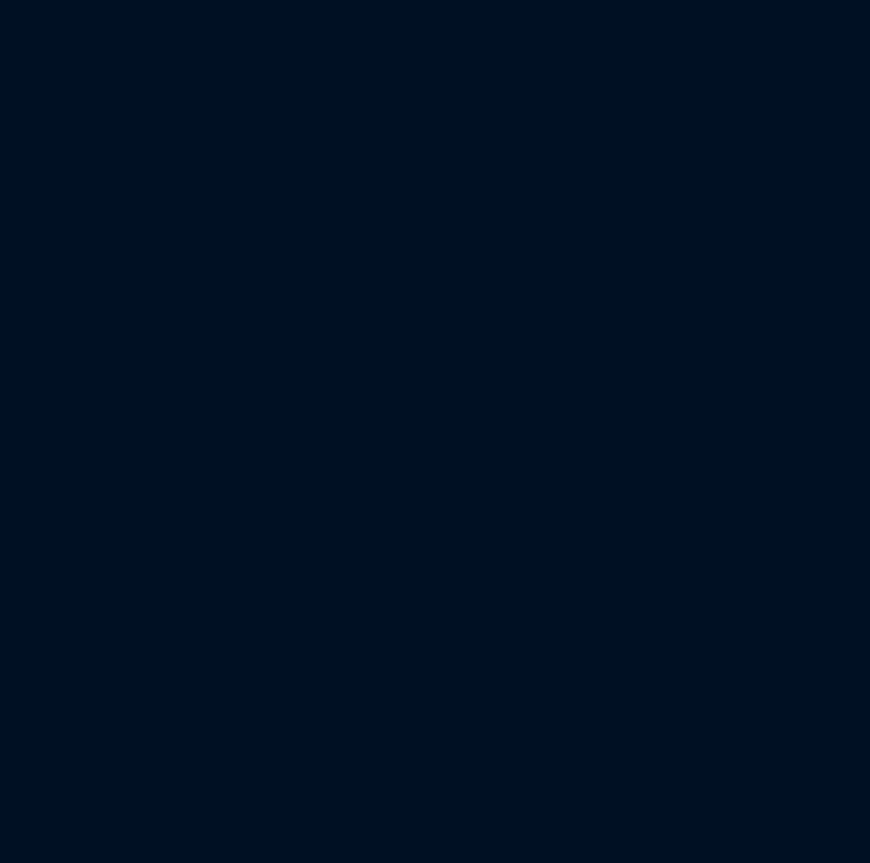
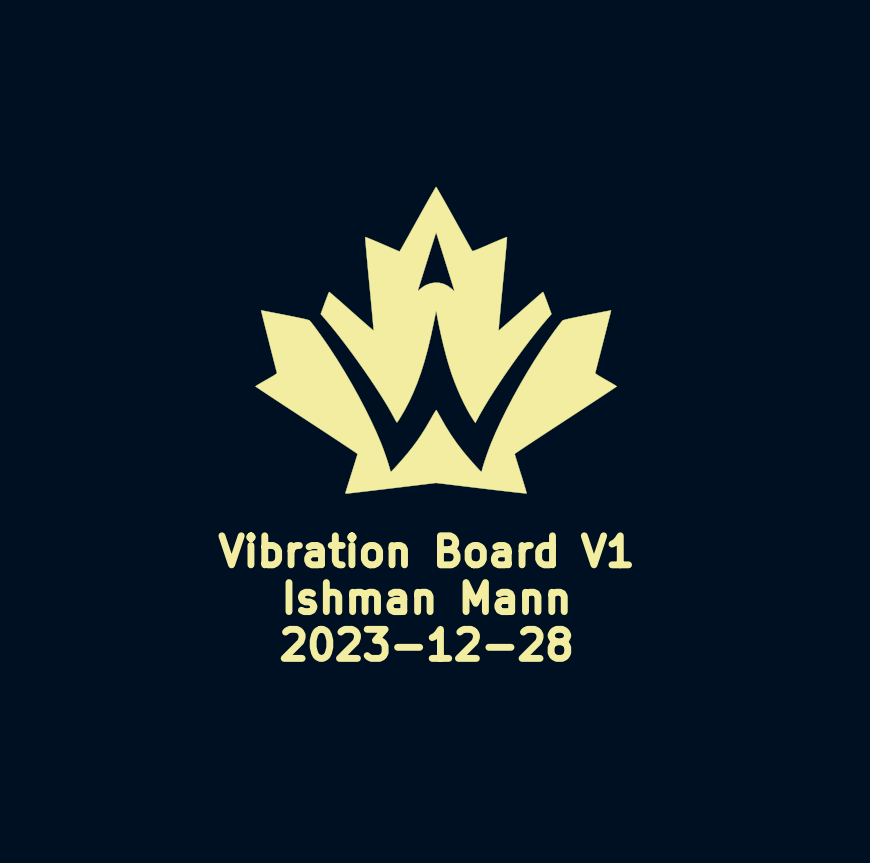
drawing: none -> [255, 186, 617, 494]
text: none -> Vibration Board V1 (425, 550)
text: none -> Ishman Mann (426, 597)
text: none -> 2023-12-28 (425, 643)

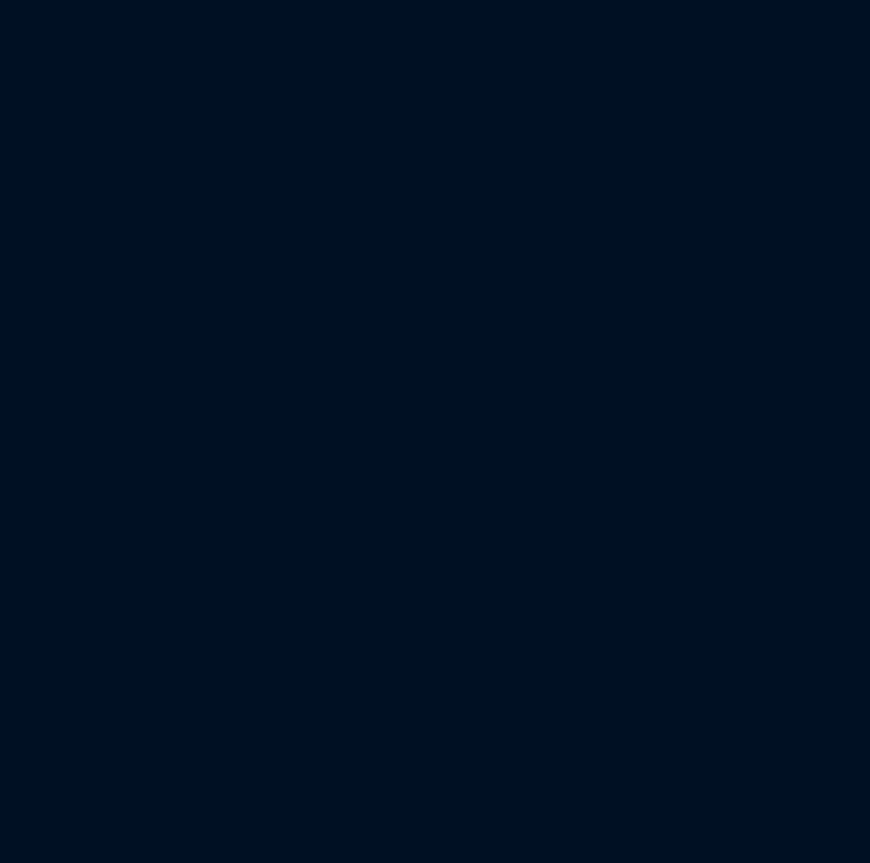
drawing: [255, 186, 617, 494] -> none
text: Vibration Board V1 (425, 550) -> none
text: Ishman Mann (426, 597) -> none
text: 2023-12-28 (425, 643) -> none

